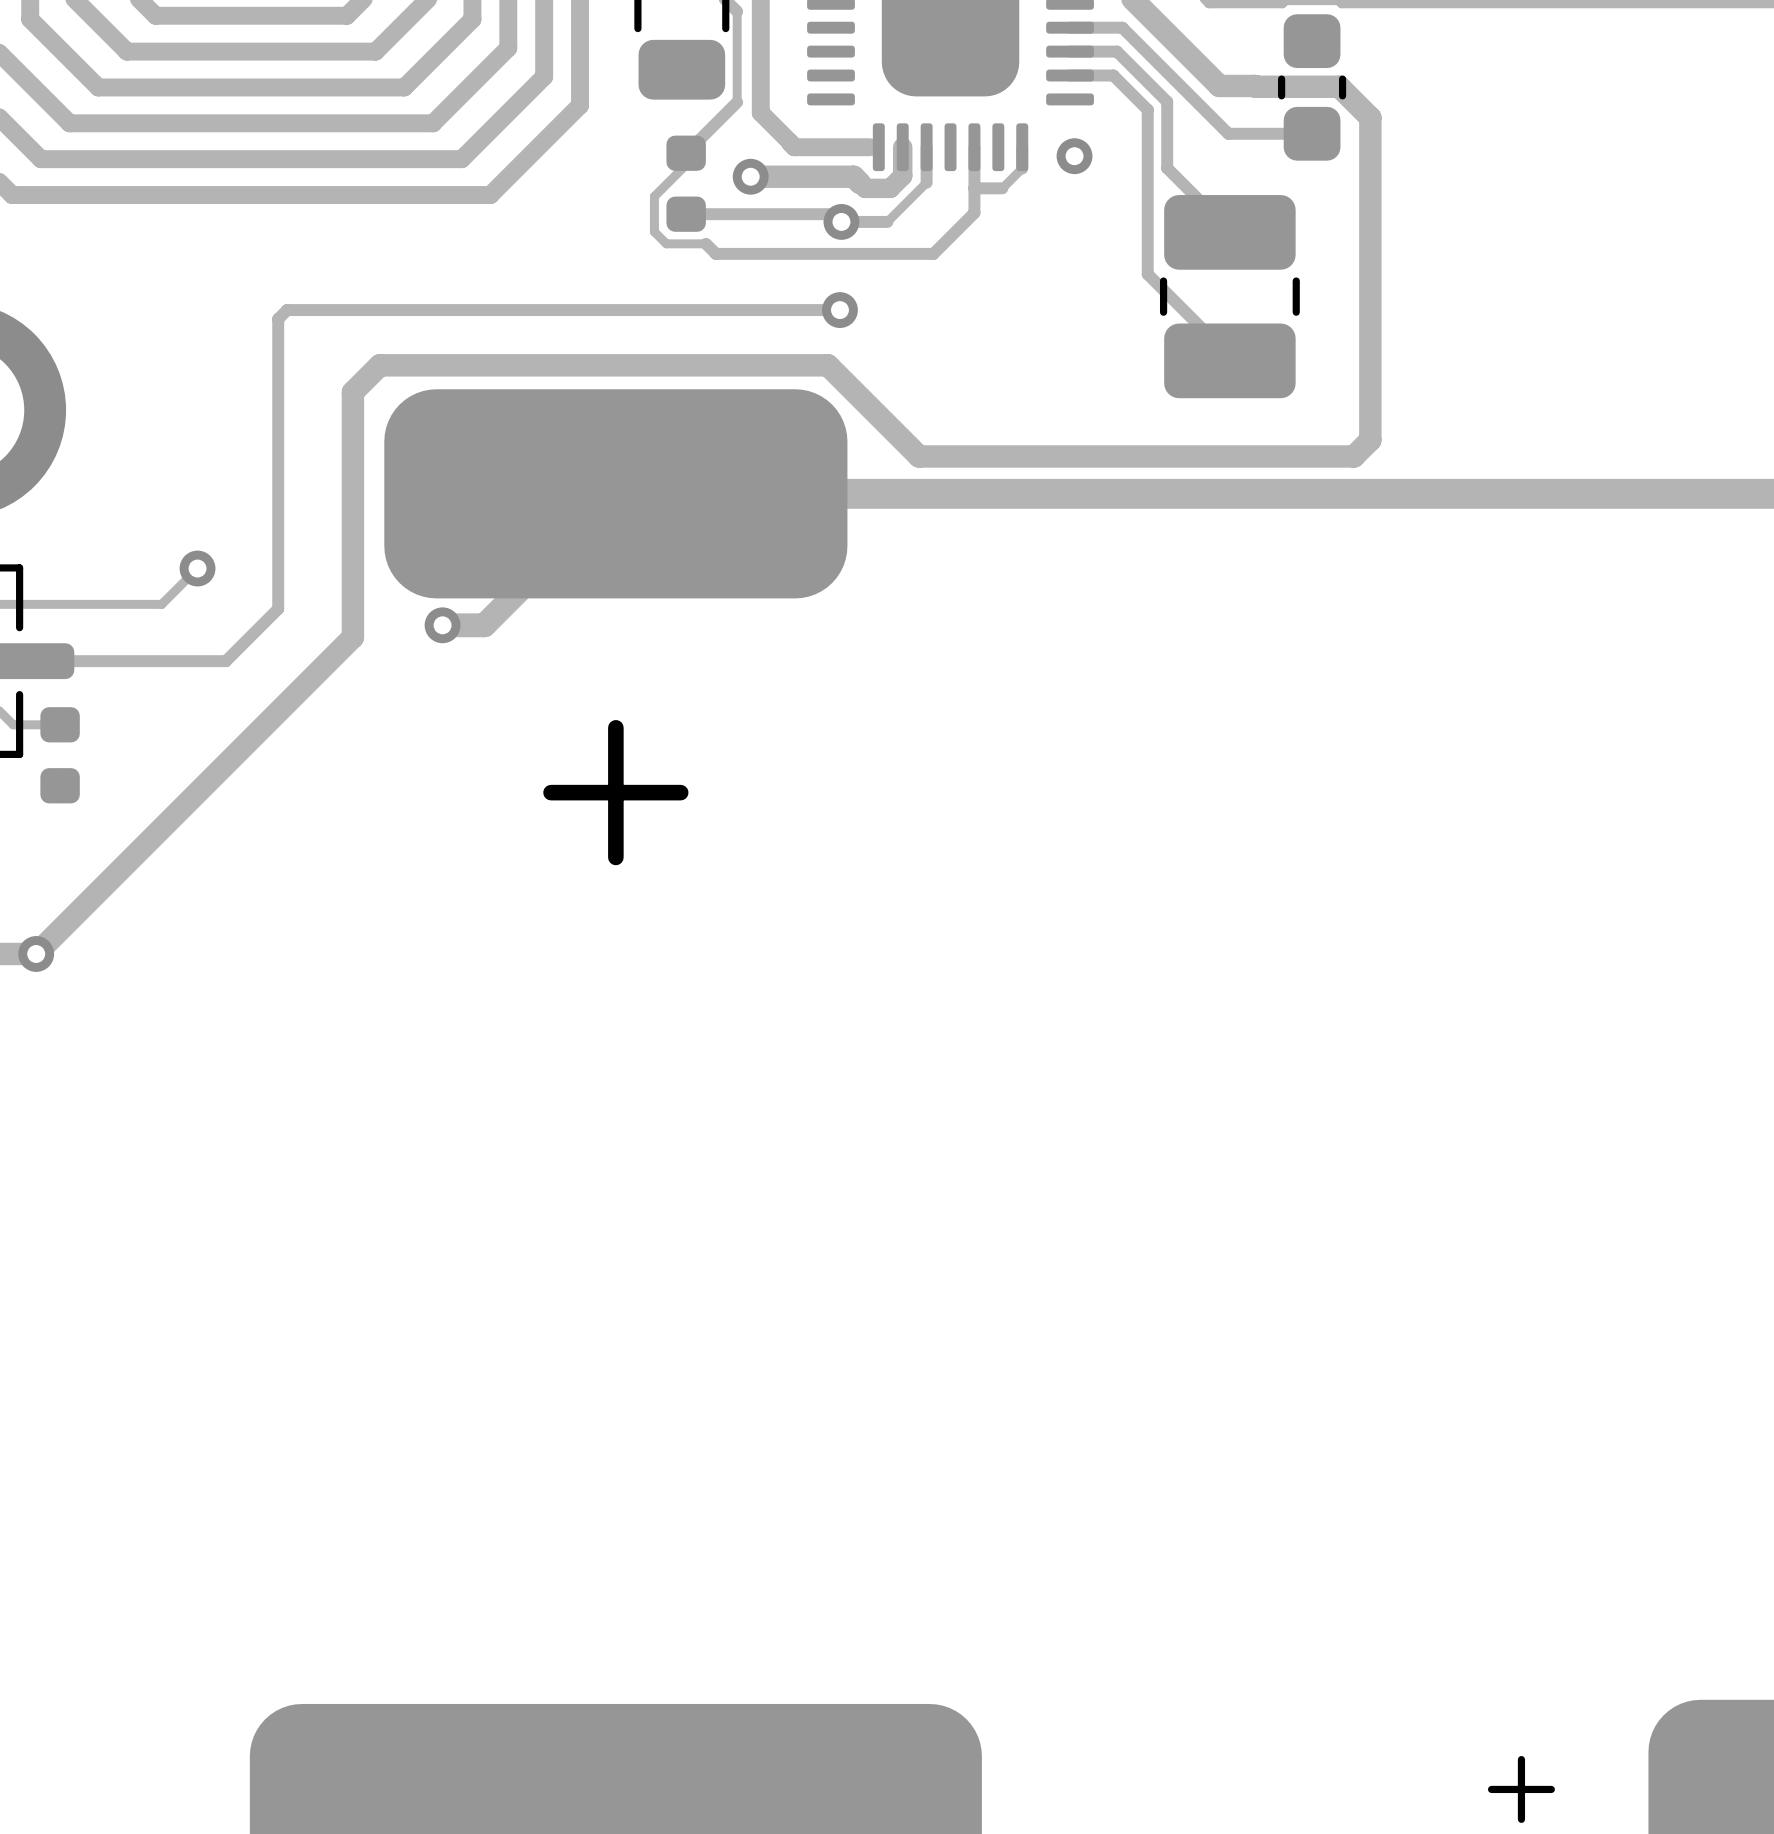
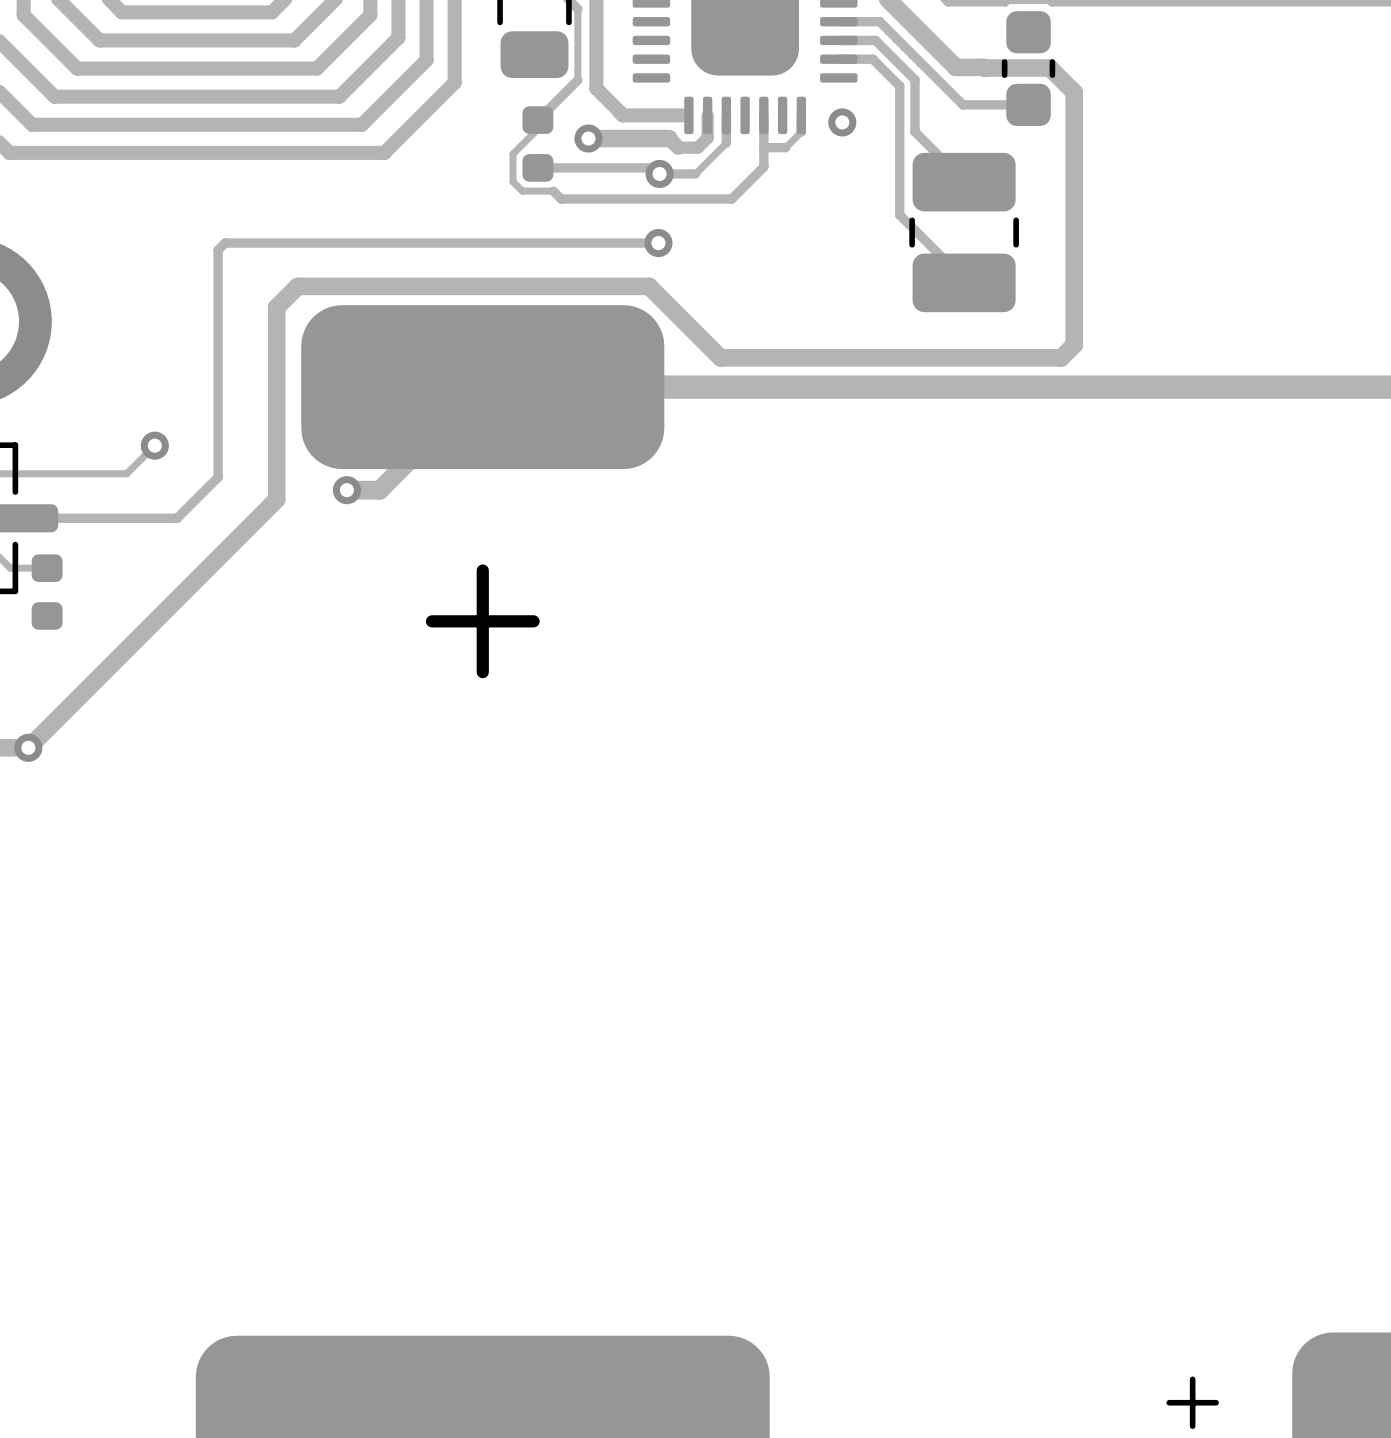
track width: thick (902, 147) (902, 175) (890, 188) (865, 188) (853, 176) -> thin (707, 115) (707, 137) (697, 147) (678, 147) (669, 138)

